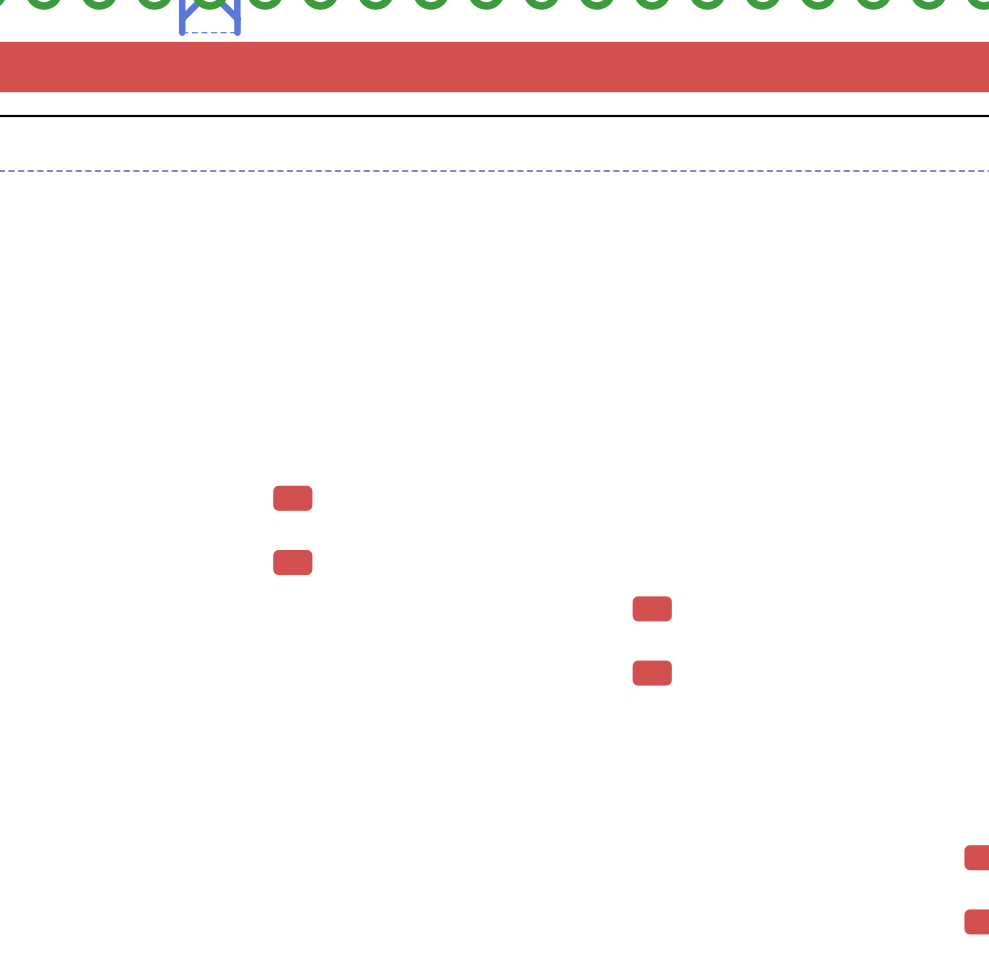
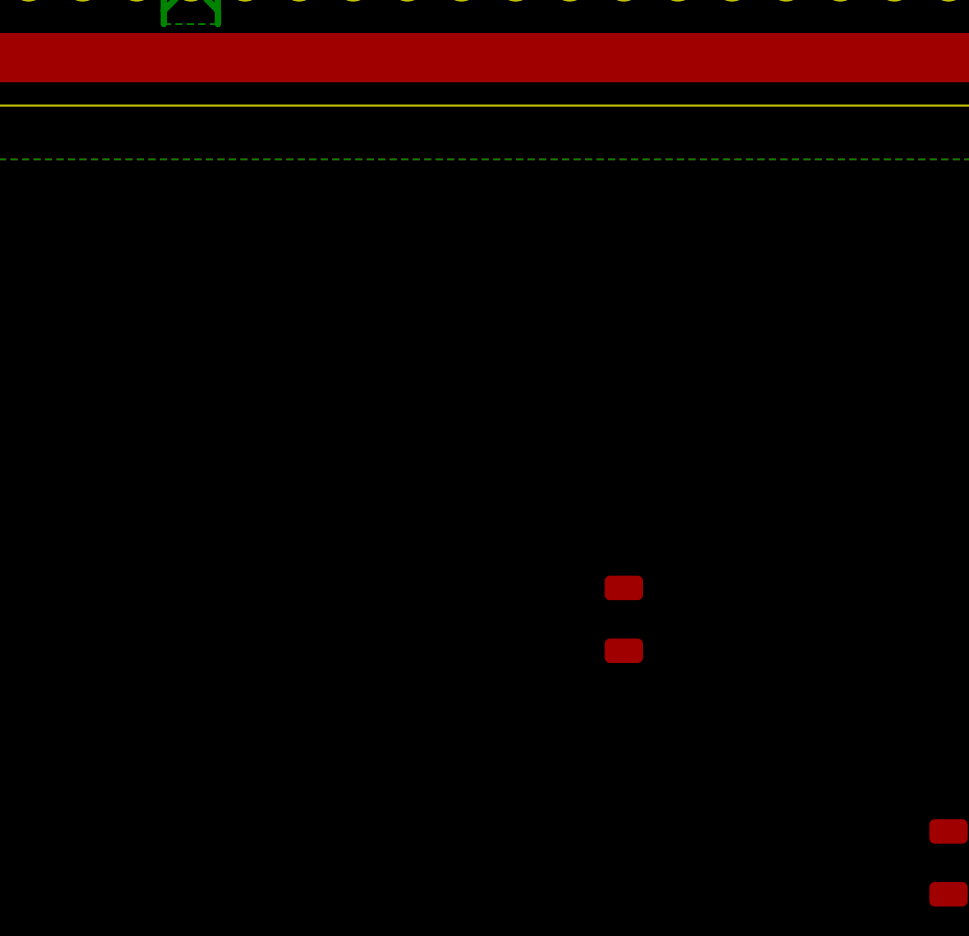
part: (292, 530) -> none

